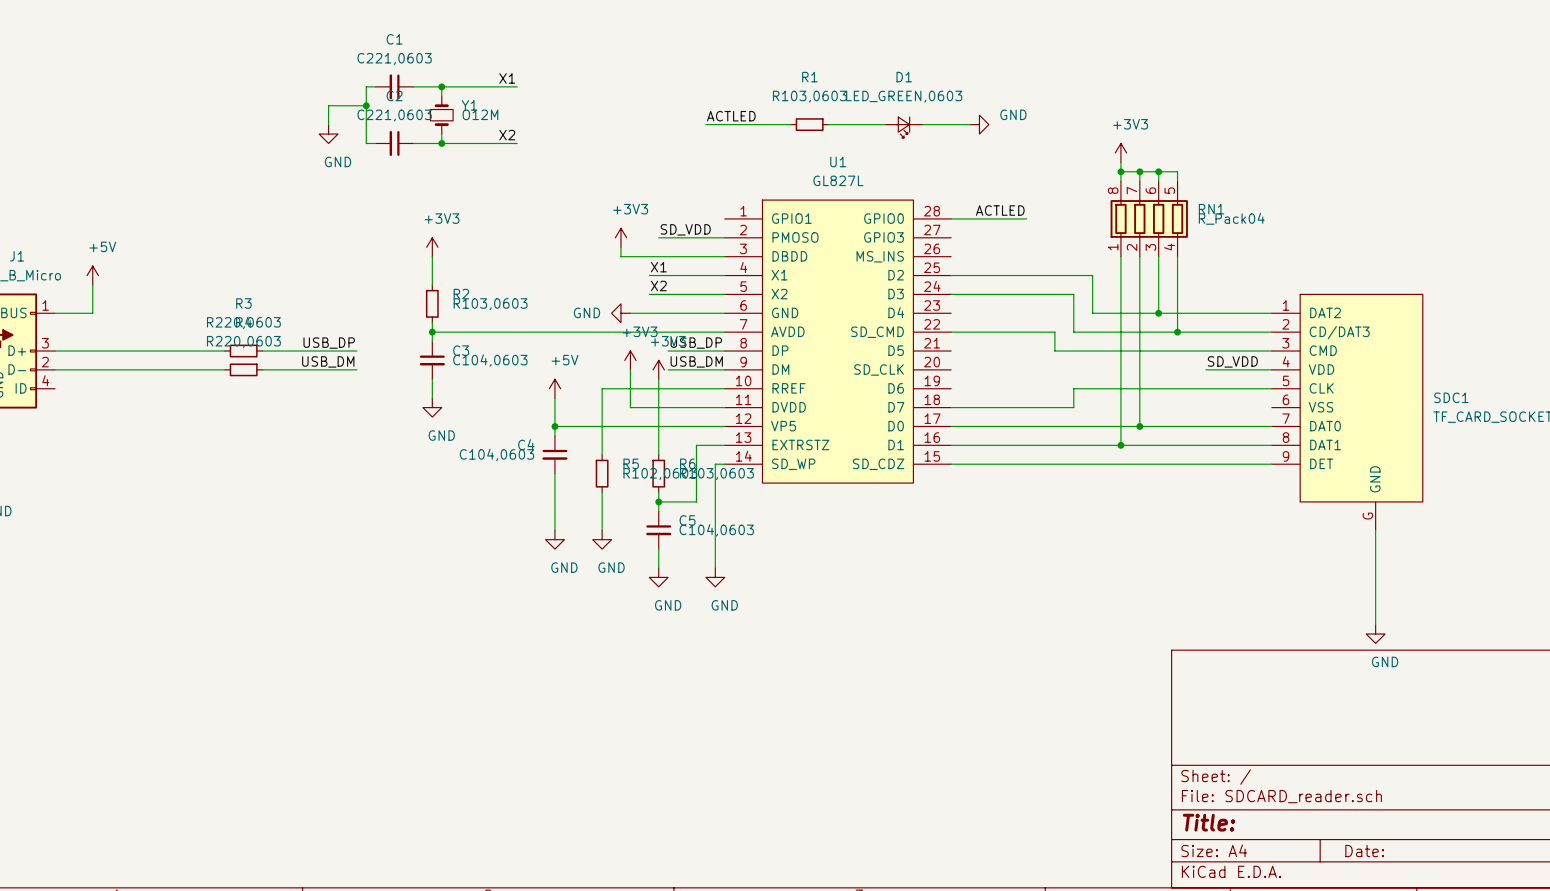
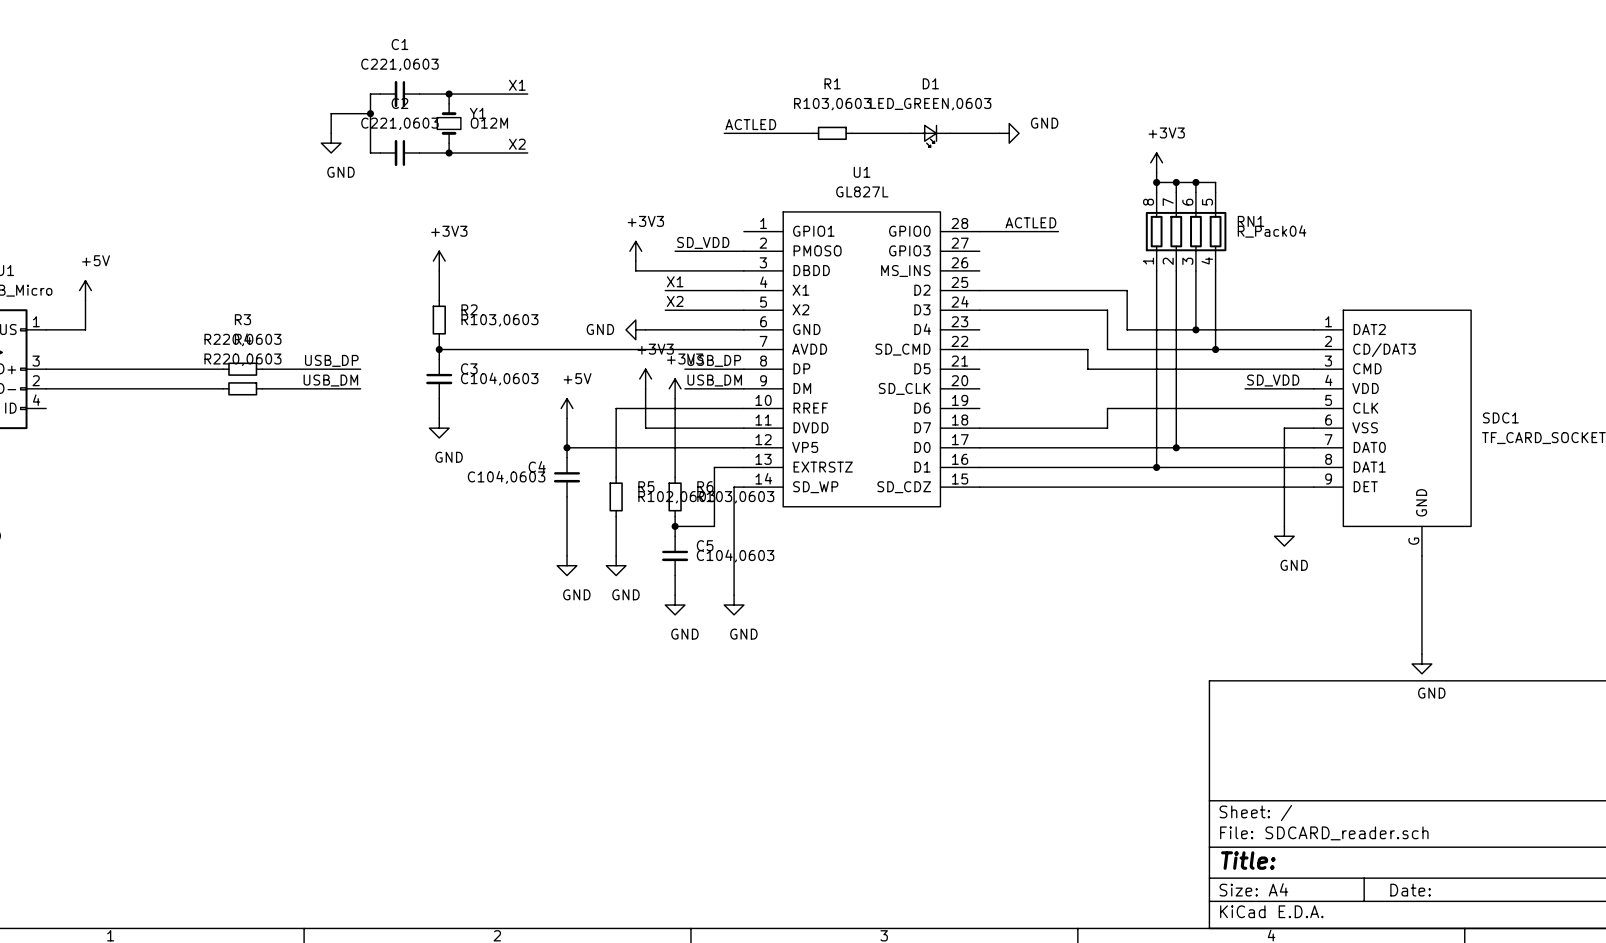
wire: none -> (1313, 428) (1284, 428) (1284, 526)
power symbol: none -> GND (1284, 536)

